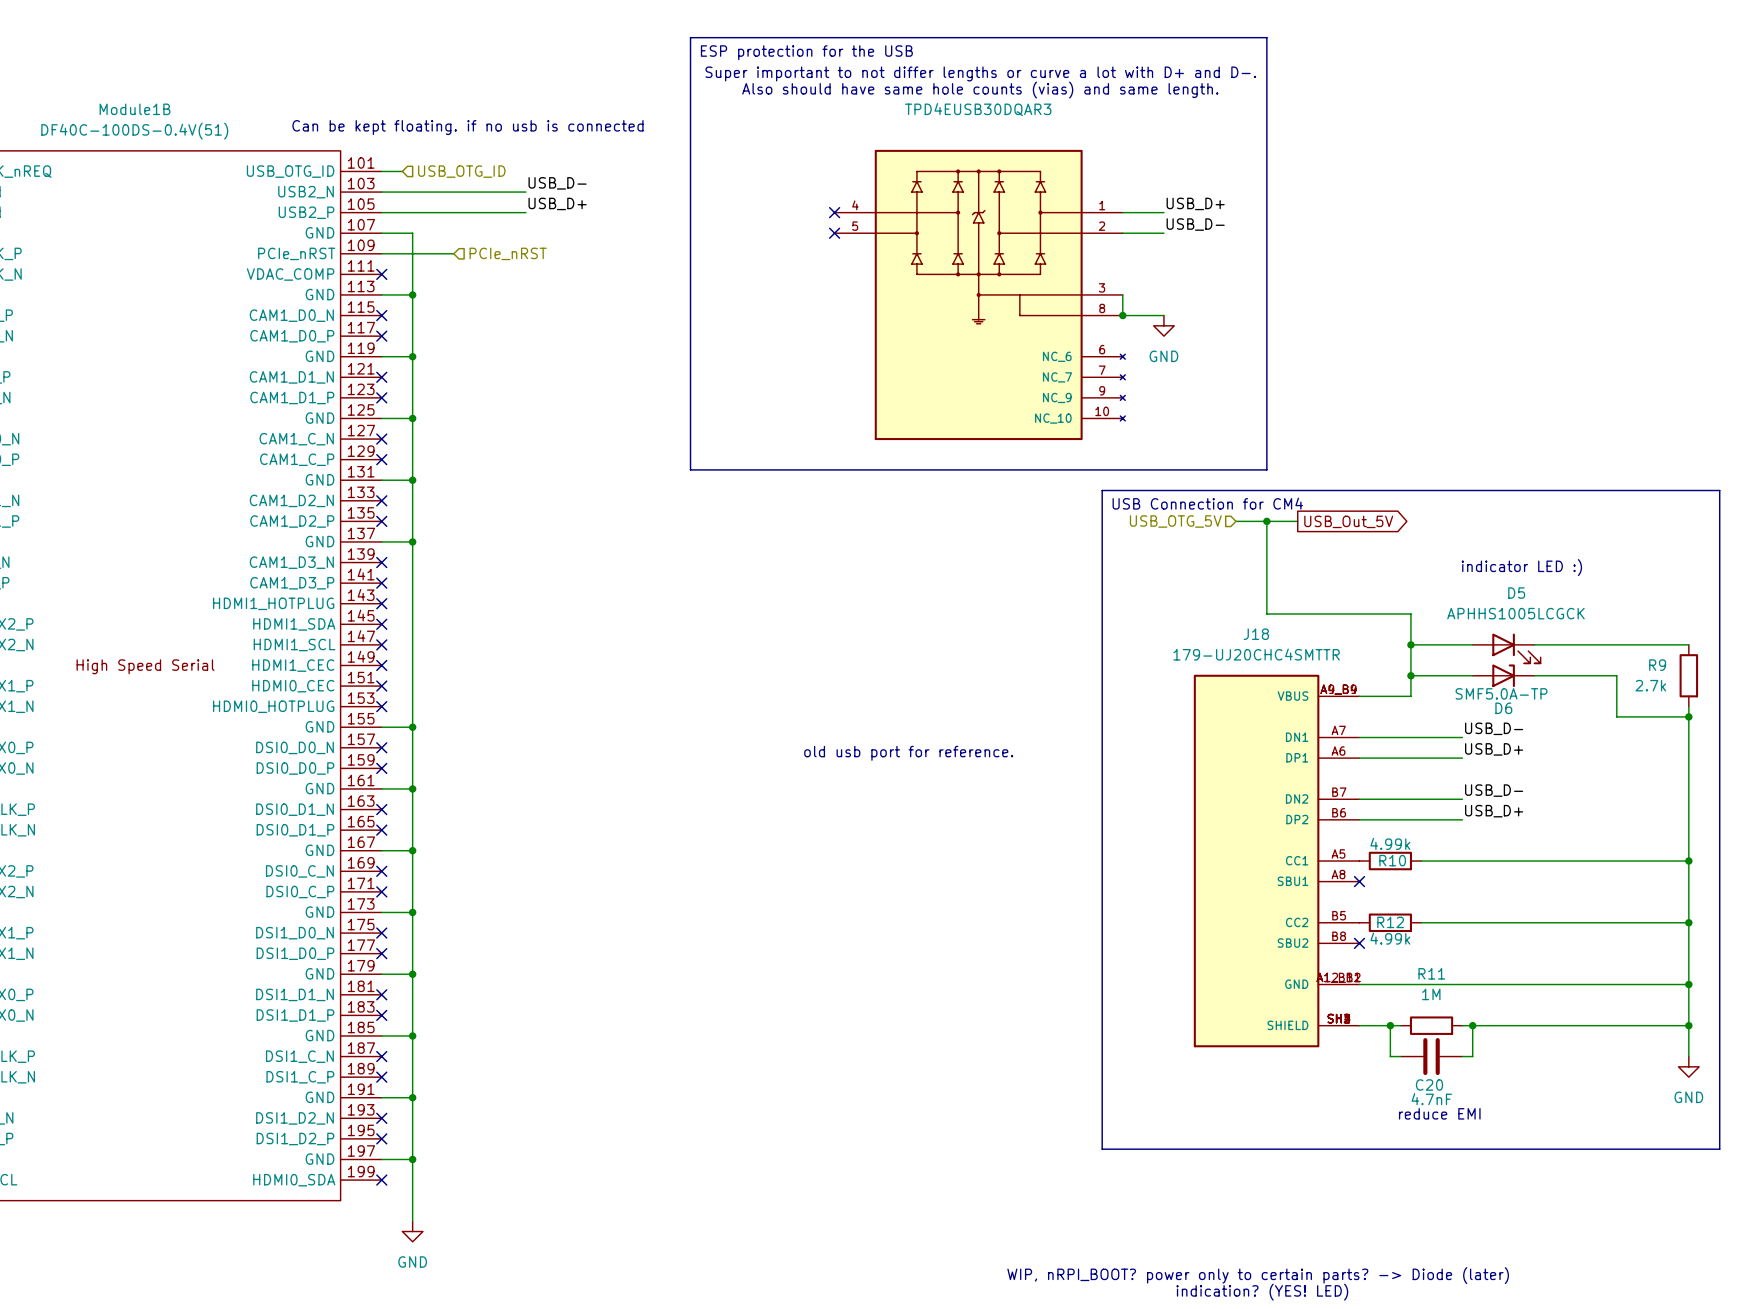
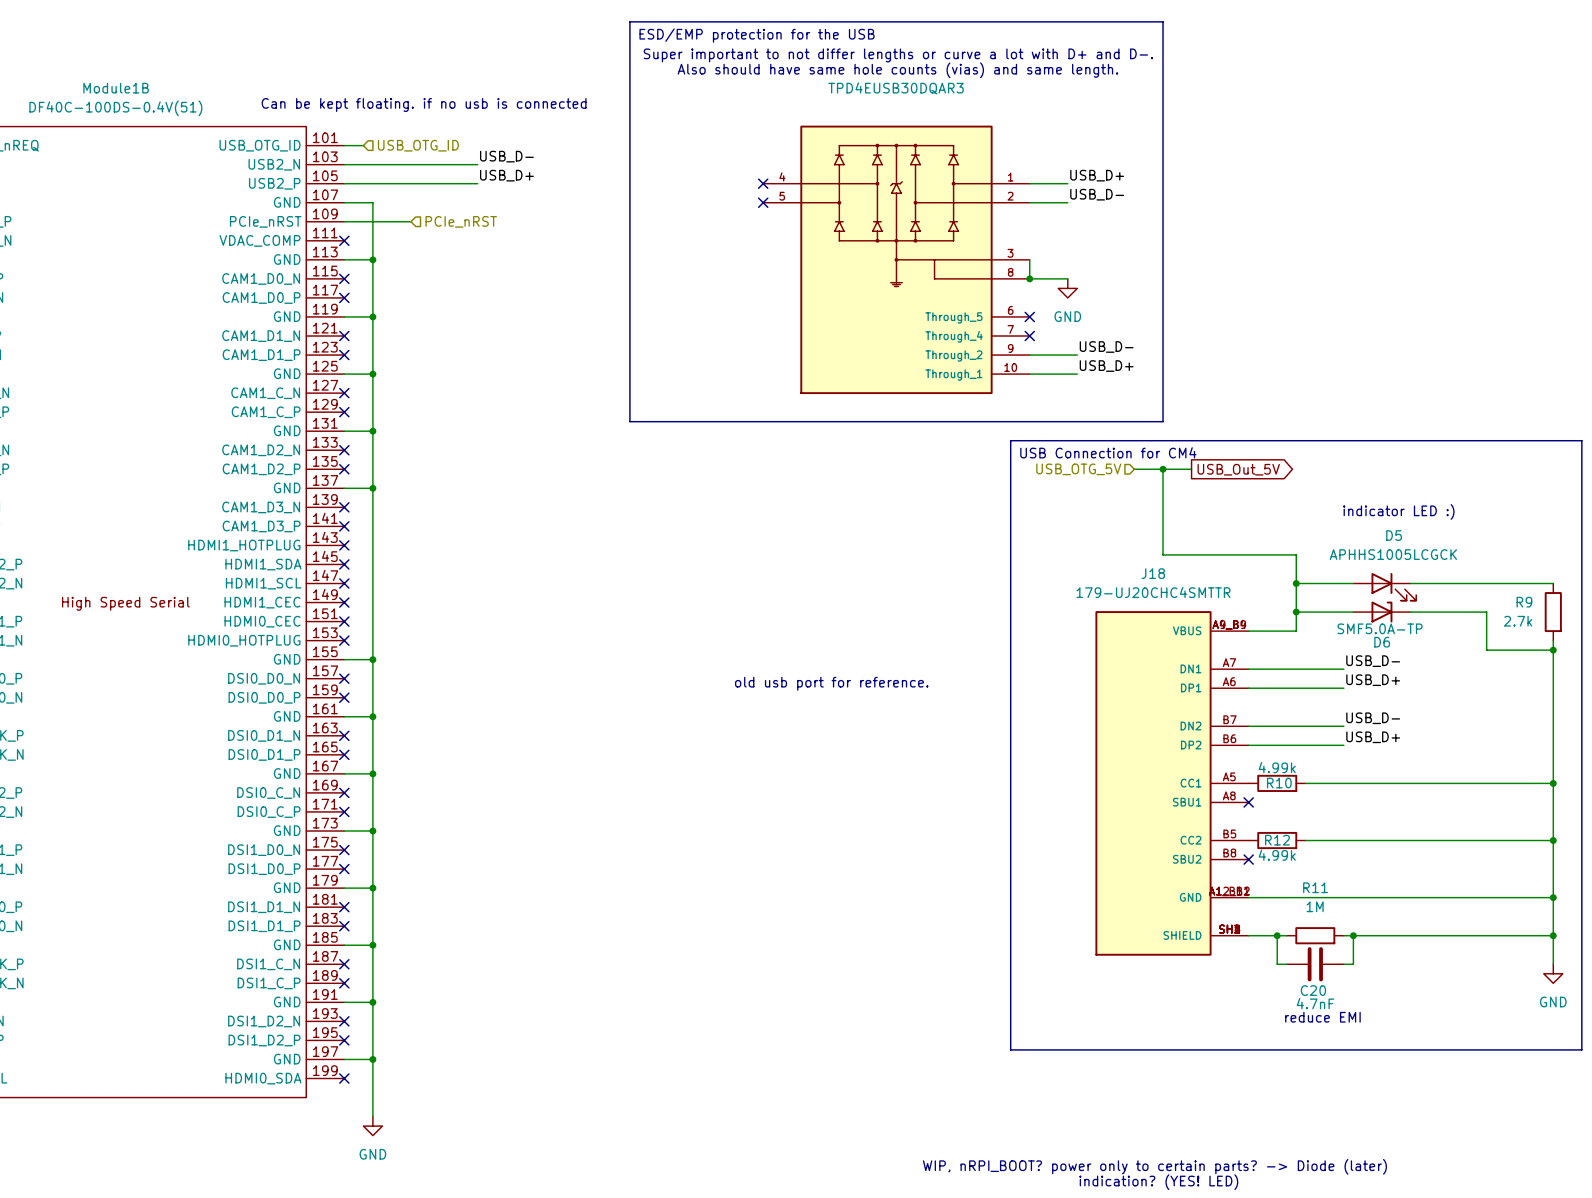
text: ESP protection for the USB (806, 52) -> ESD/EMP protection for the USB (757, 35)
TPD4EUSB30DQAR3 symbol: [834, 149, 1126, 441] -> [763, 125, 1030, 395]
no-connect mark: none -> (1029, 316)
no-connect mark: none -> (1029, 336)
label: none -> USB_D- (1106, 347)
wire: none -> (1029, 355) (1077, 355)
label: none -> USB_D+ (1106, 366)
wire: none -> (1029, 374) (1077, 374)

